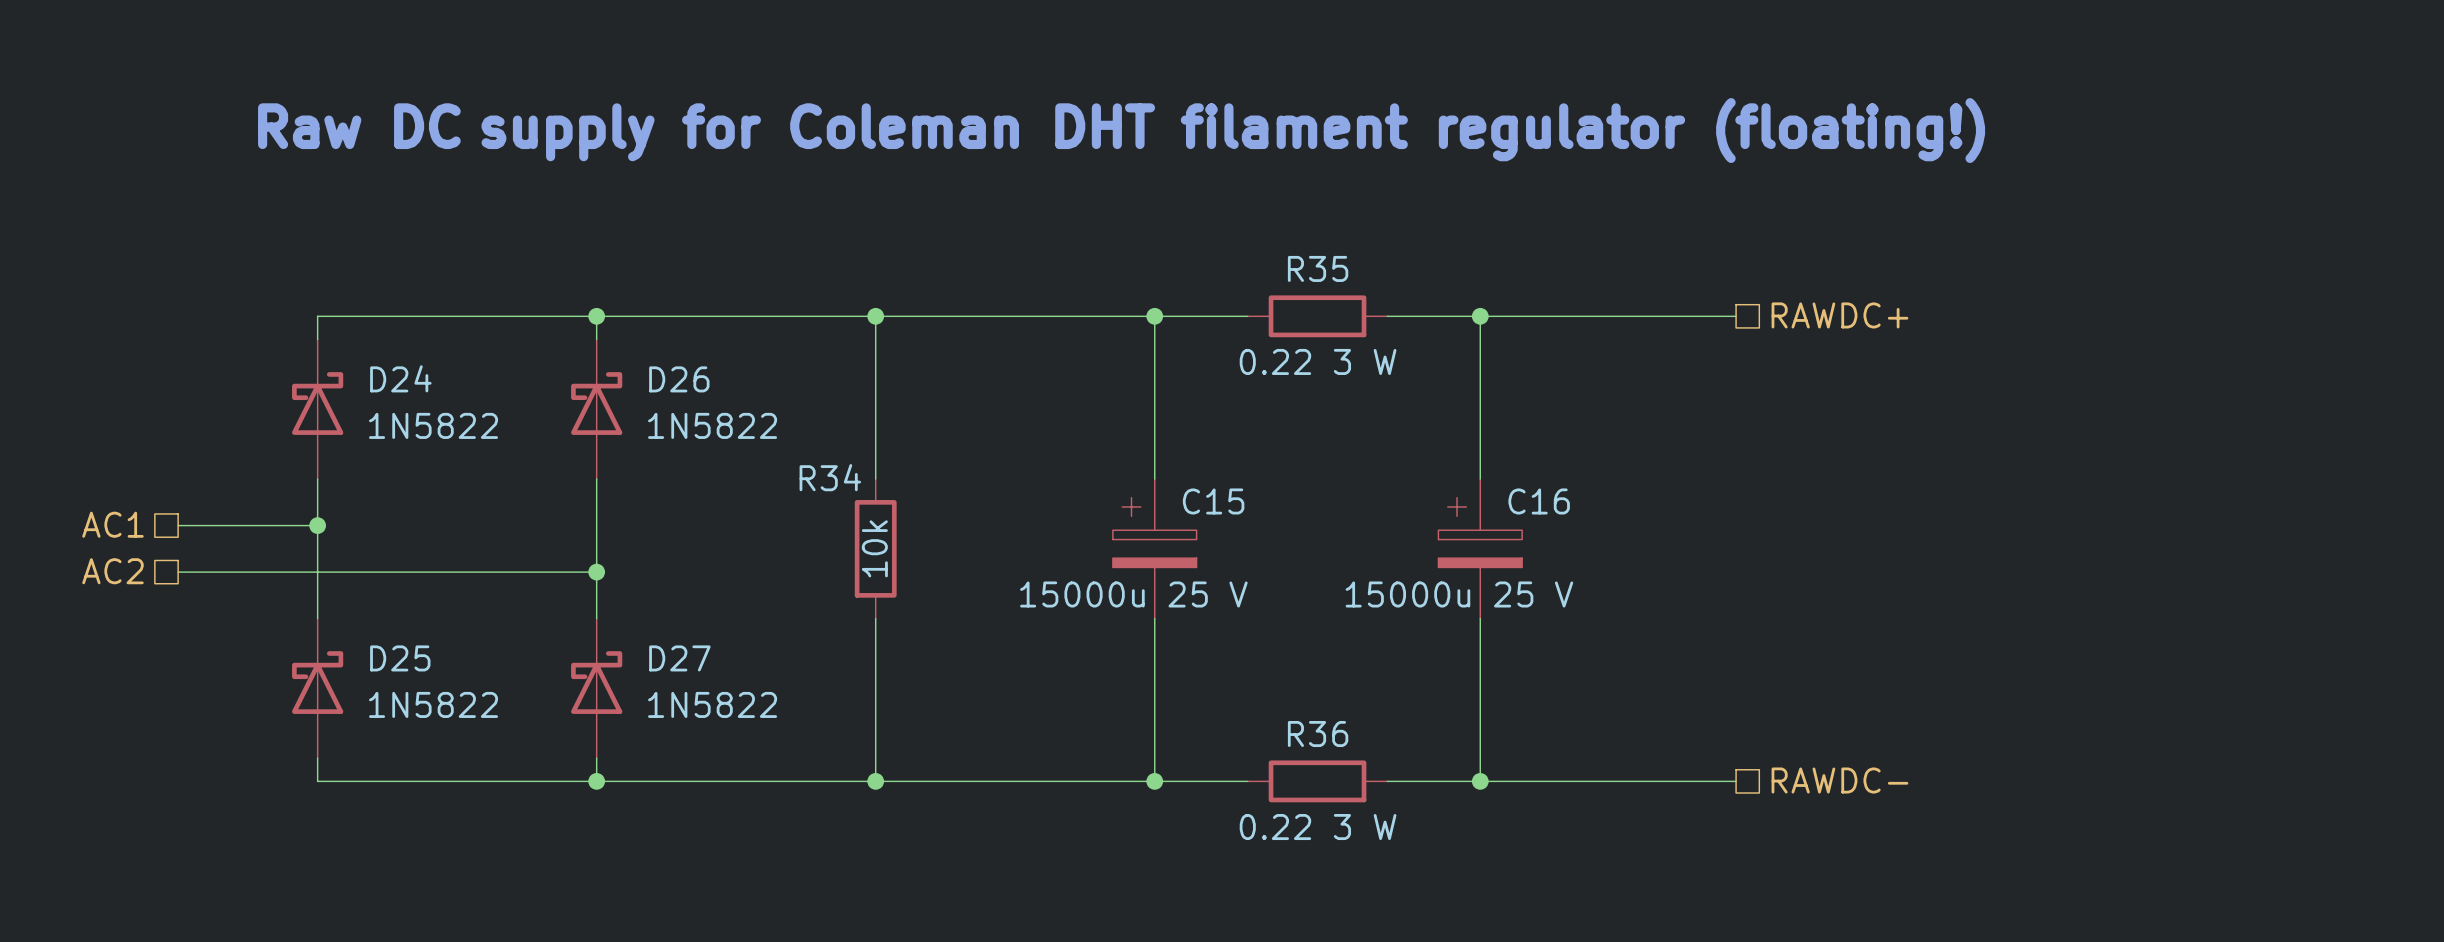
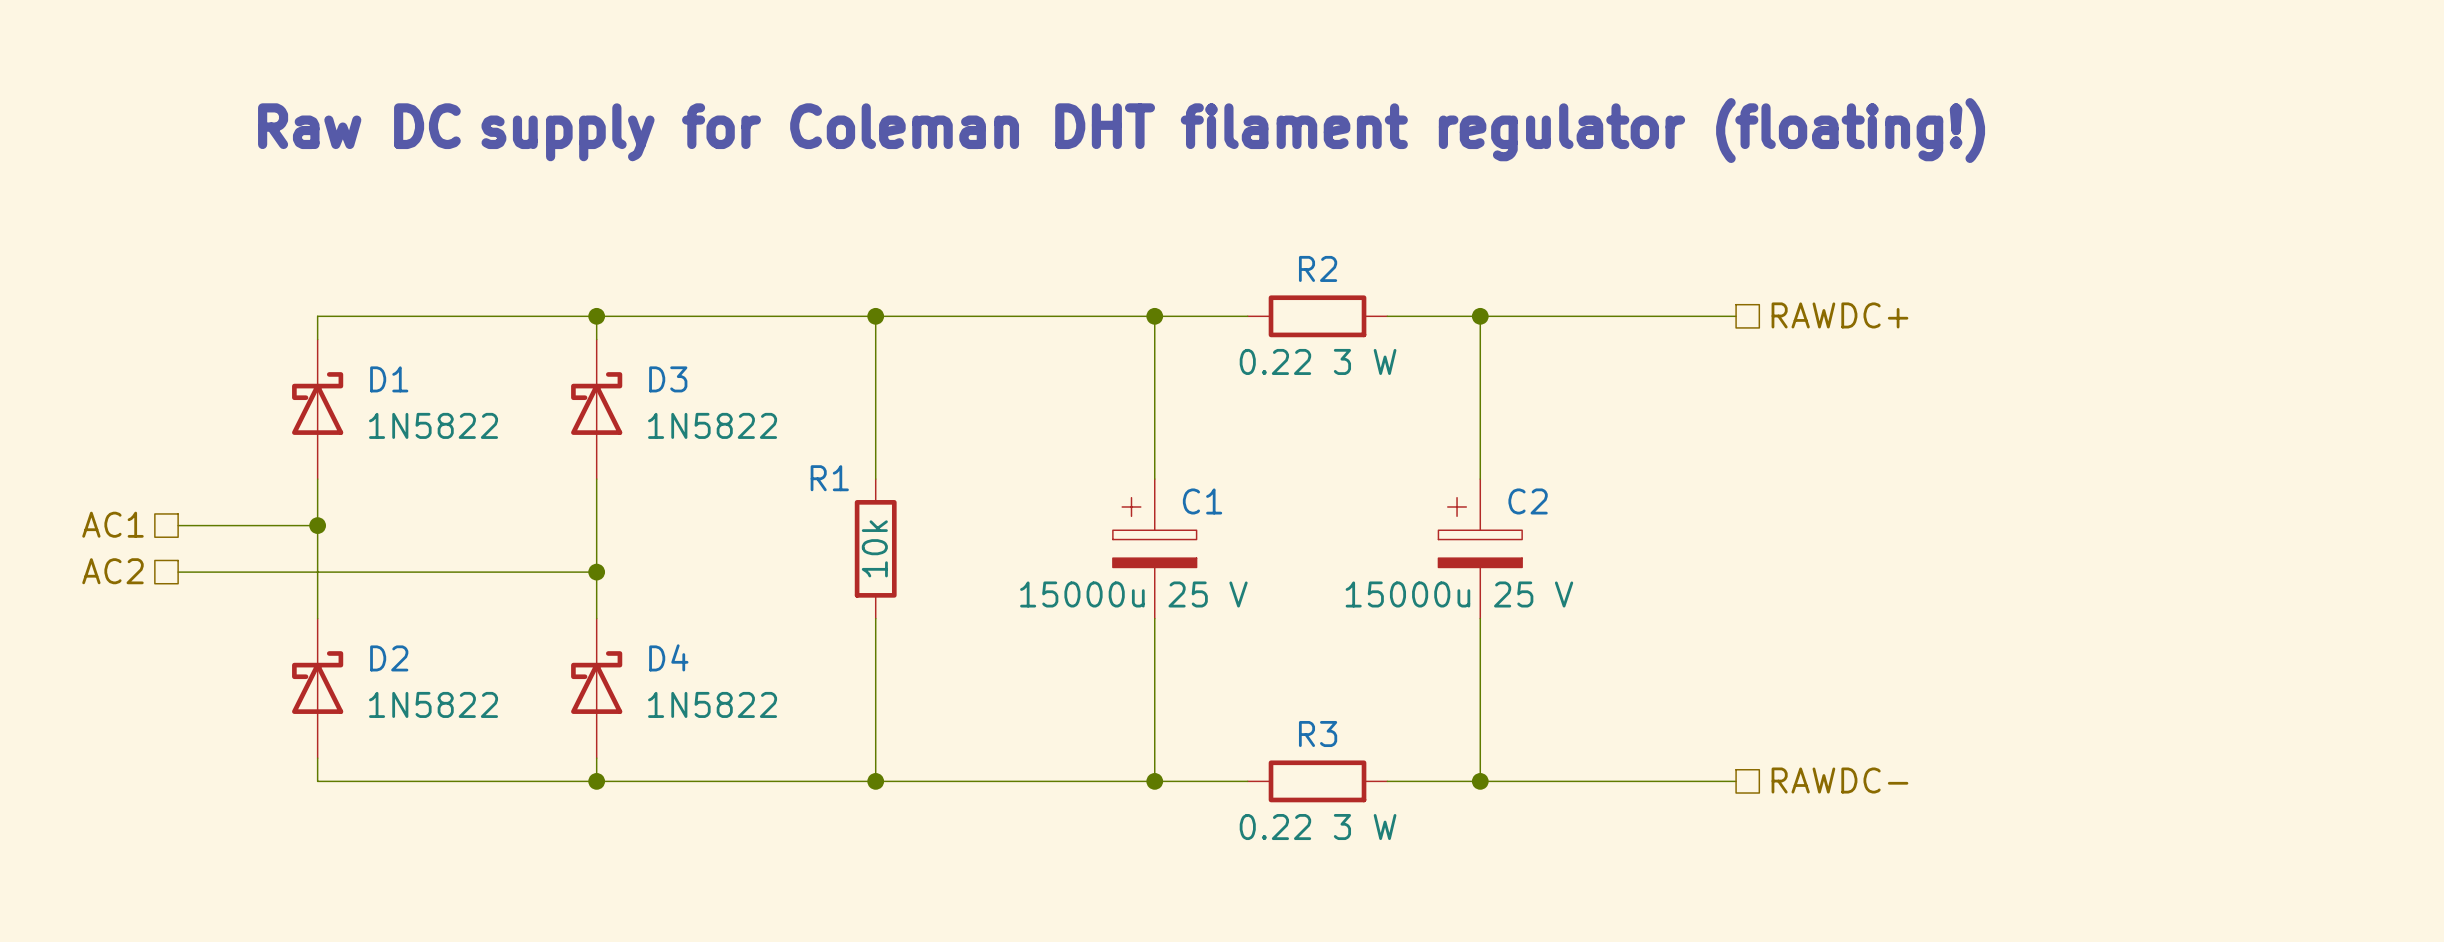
R35 name: R35 (1318, 268) -> R2 (1318, 268)
D24 name: D24 (400, 378) -> D1 (389, 379)
D26 name: D26 (679, 379) -> D3 (668, 379)
R34 name: R34 (830, 477) -> R1 (829, 478)
C15 name: C15 (1213, 501) -> C1 (1202, 501)
C16 name: C16 (1539, 501) -> C2 (1528, 501)
D25 name: D25 (400, 658) -> D2 (389, 658)
D27 name: D27 (679, 658) -> D4 (668, 657)
R36 name: R36 (1318, 734) -> R3 (1318, 734)

